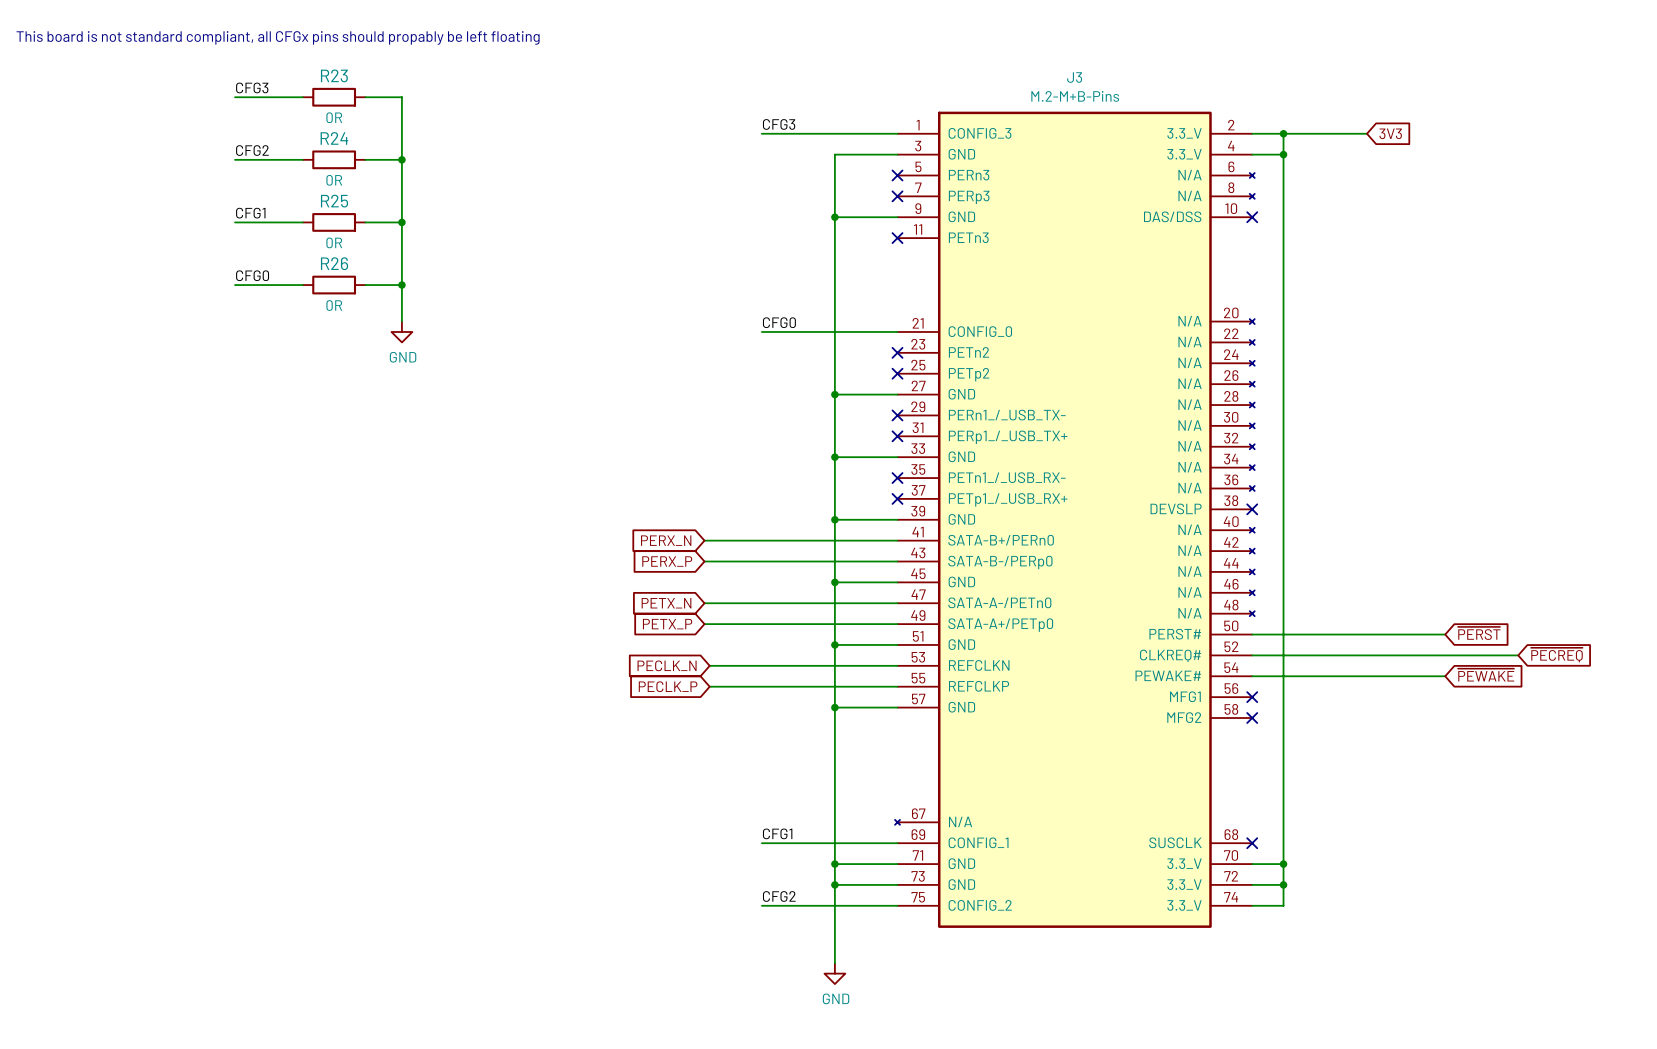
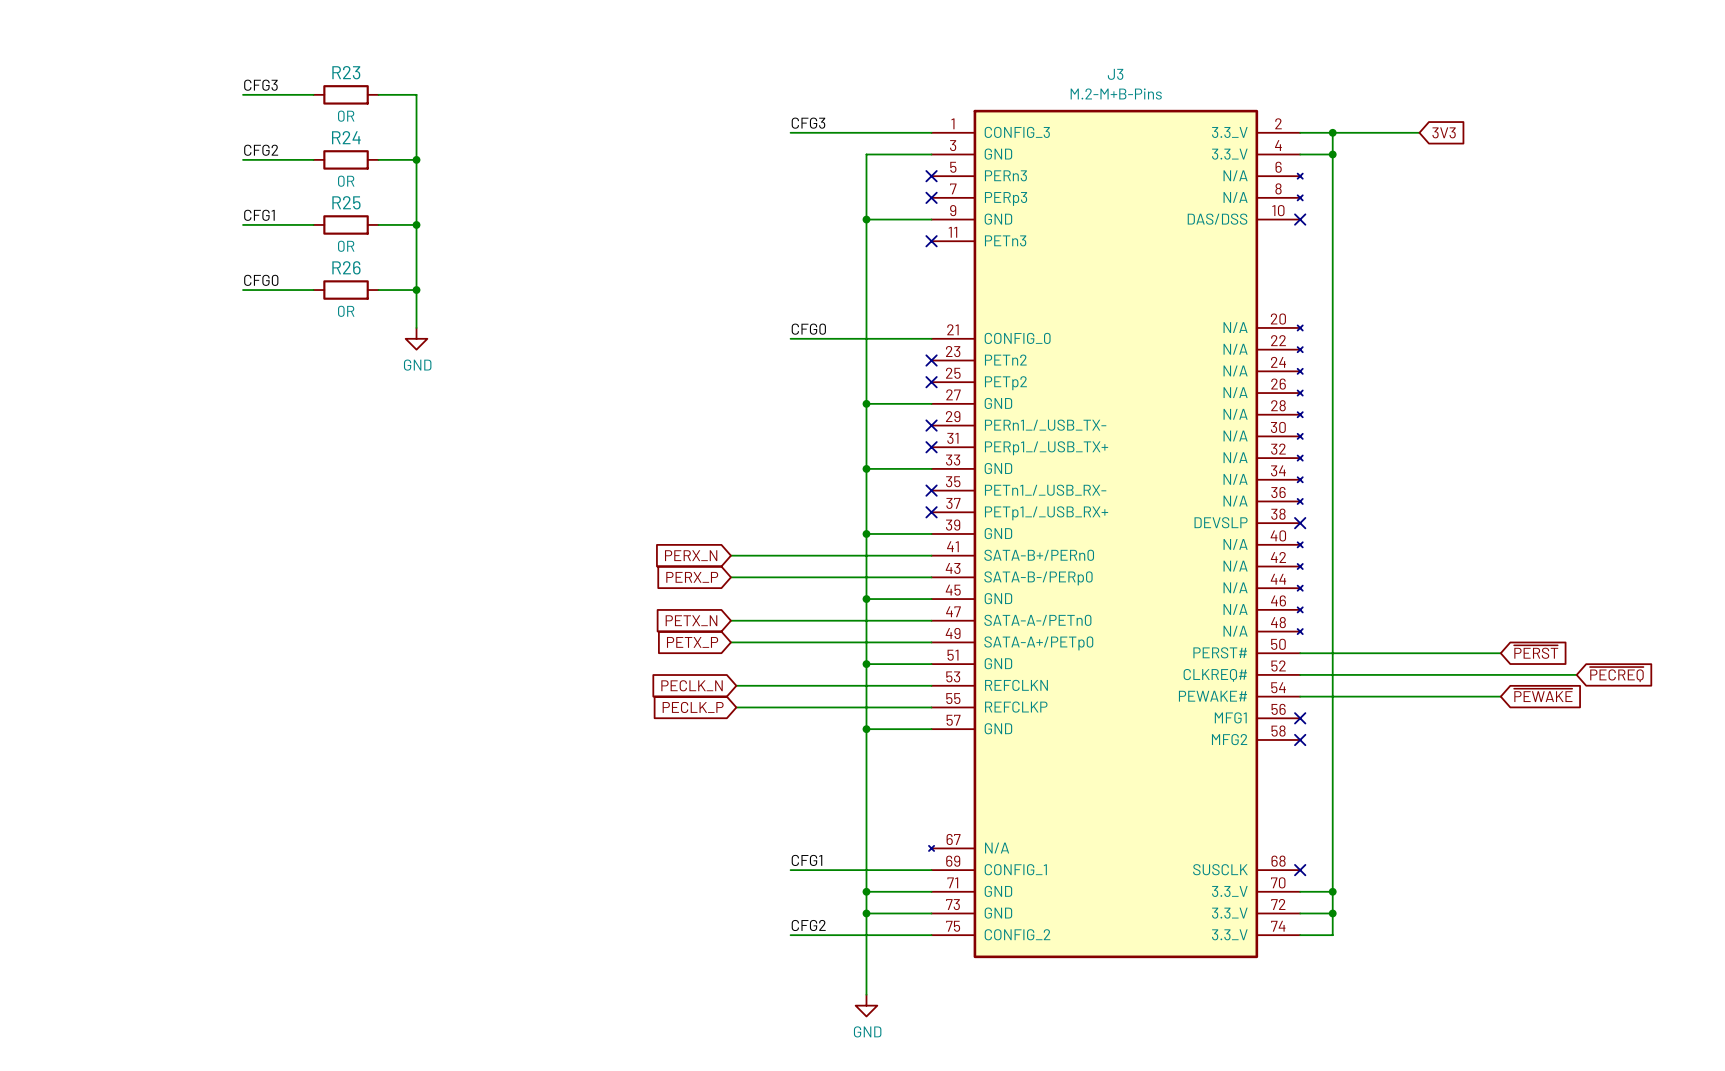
text: This board is not standard compliant, all CFGx pins should propably be left floating (278, 37) -> none

